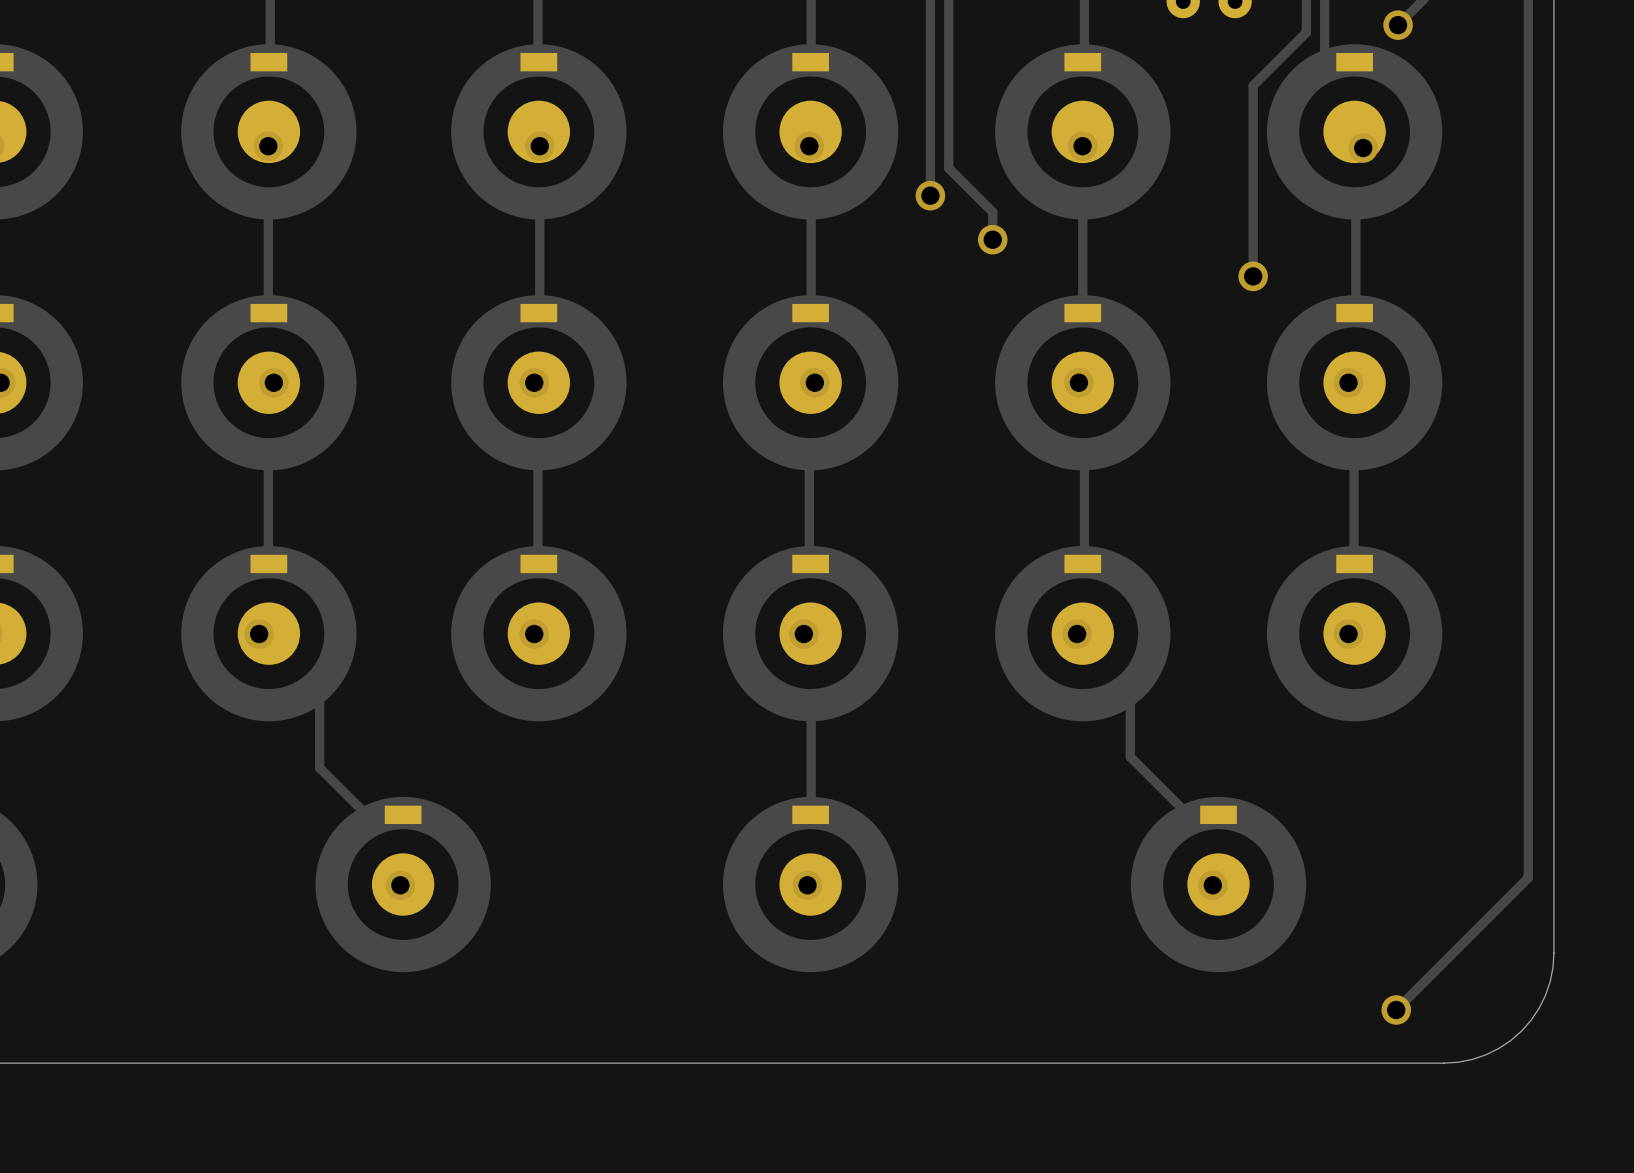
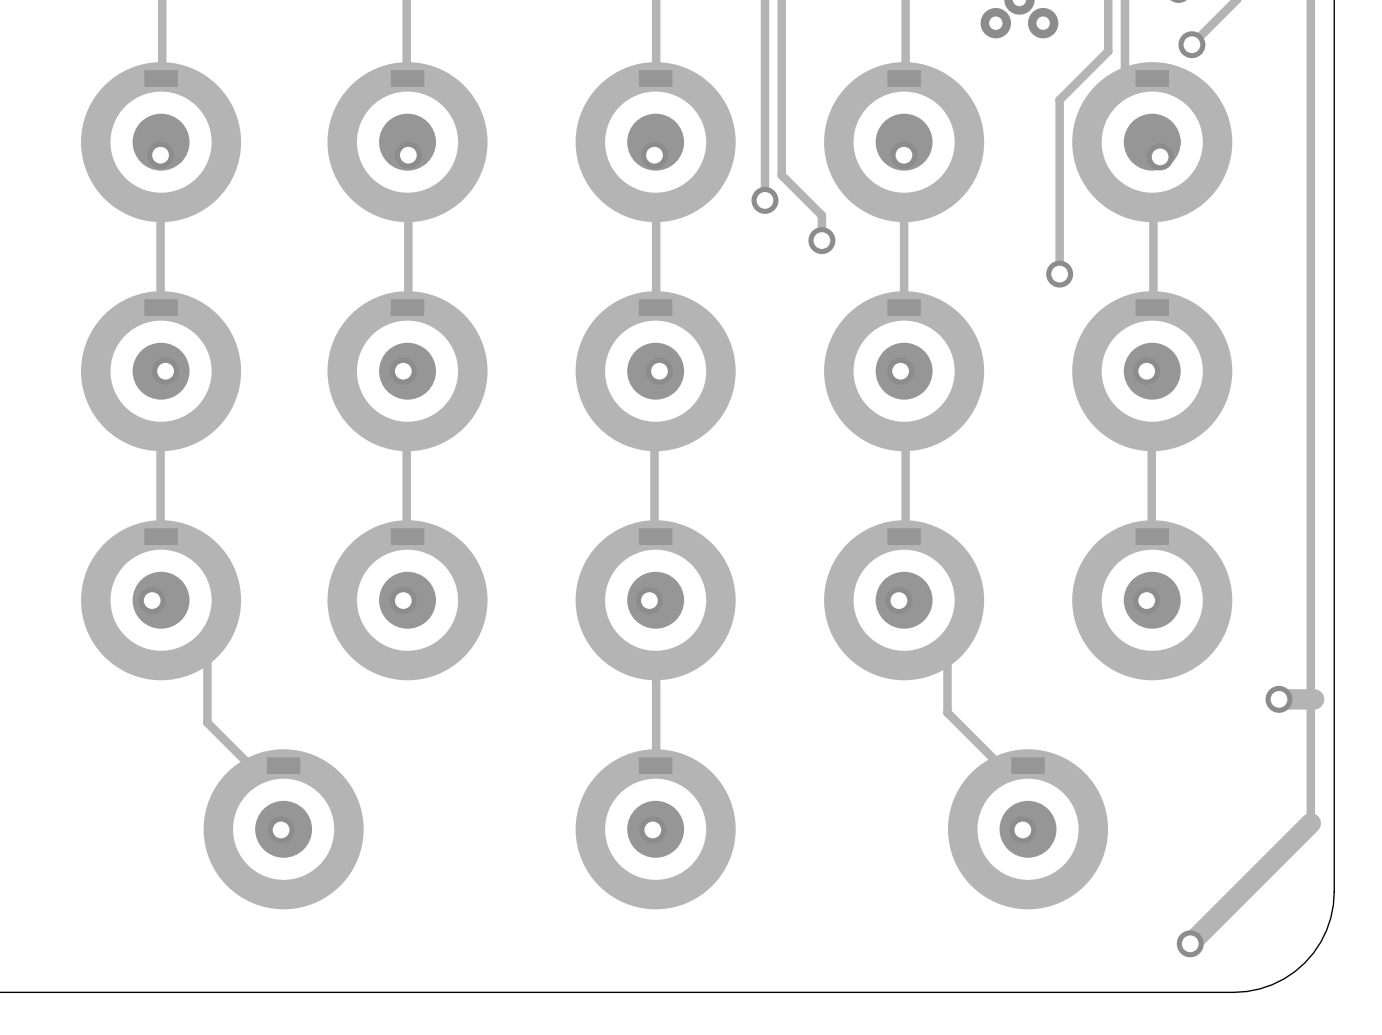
track: none -> (1278, 699) (1314, 699)
via: none -> (1278, 699)
track width: thin (1528, 877) (1396, 1009) -> thick (1310, 823) (1190, 943)

